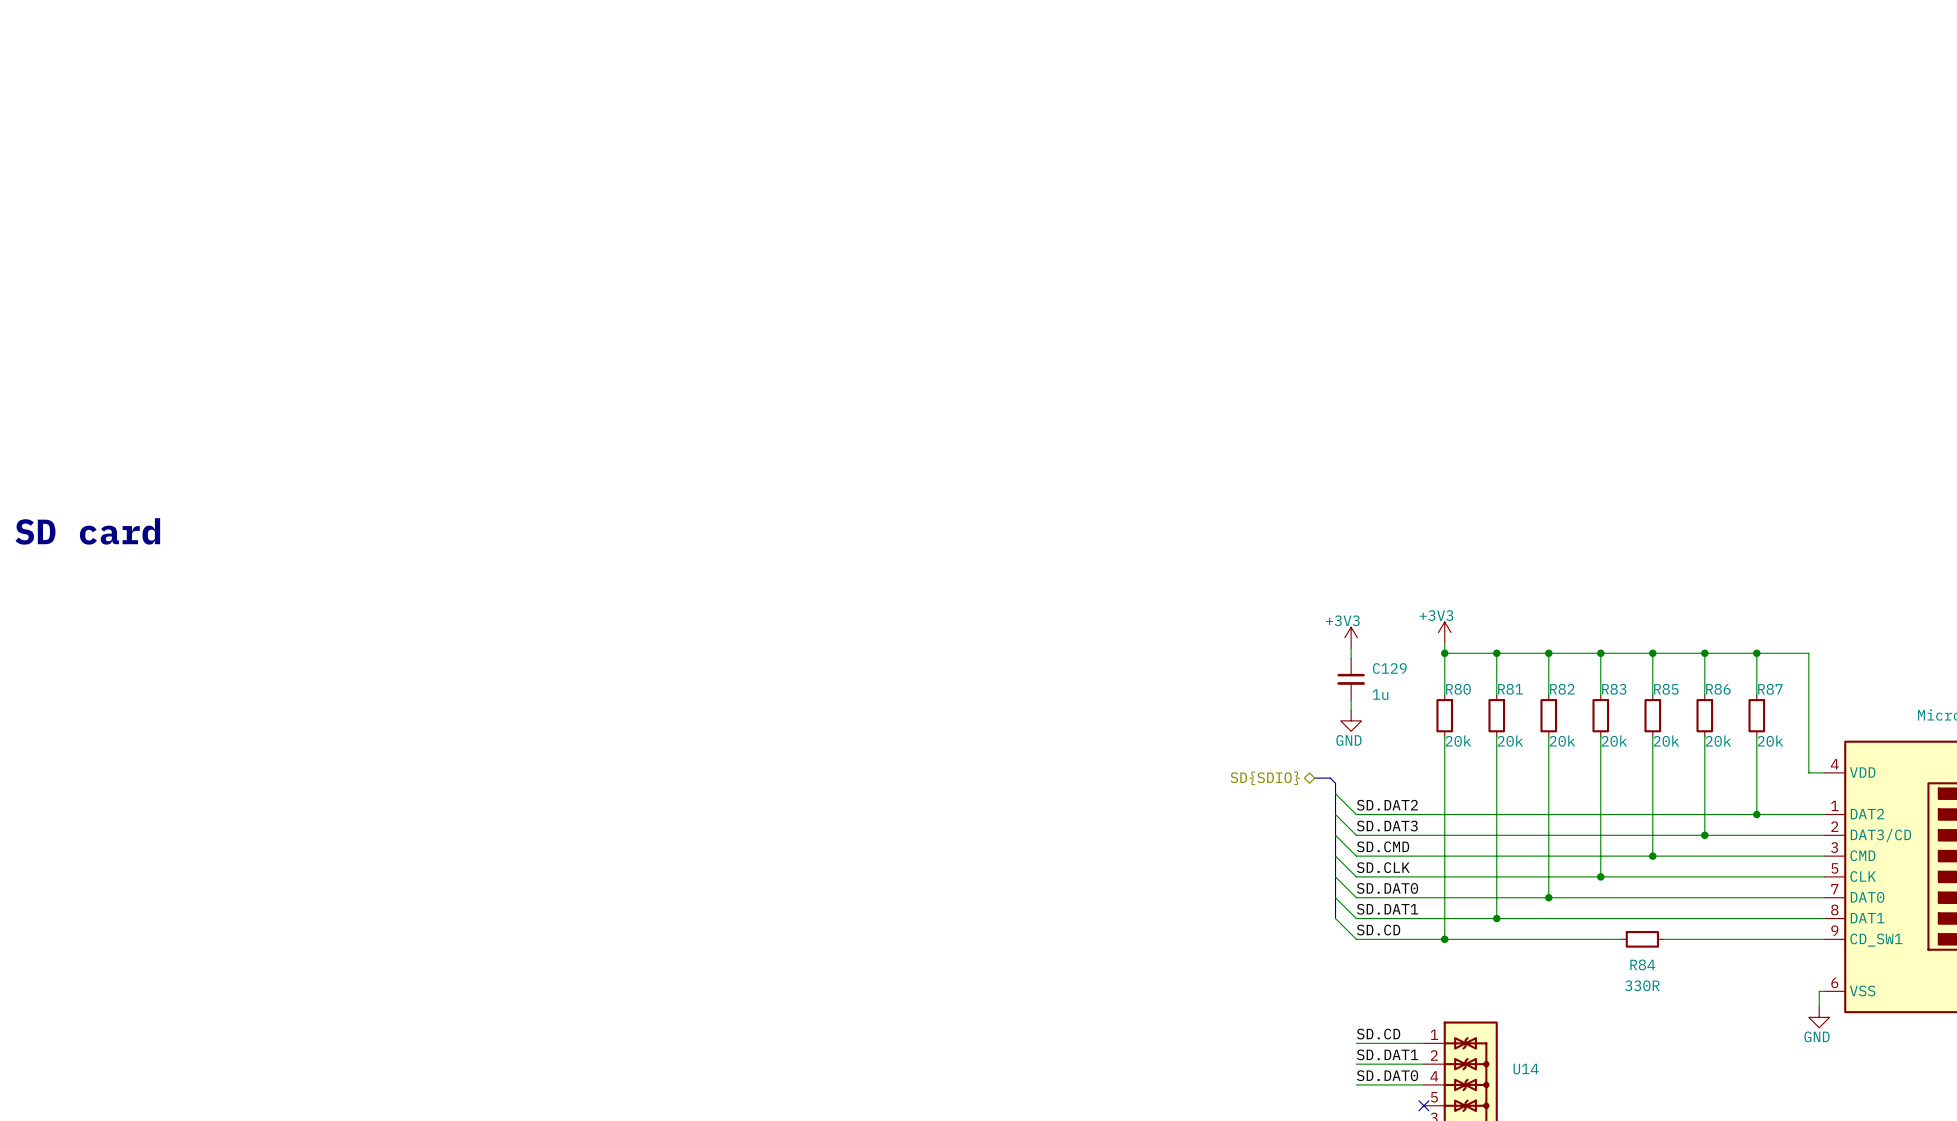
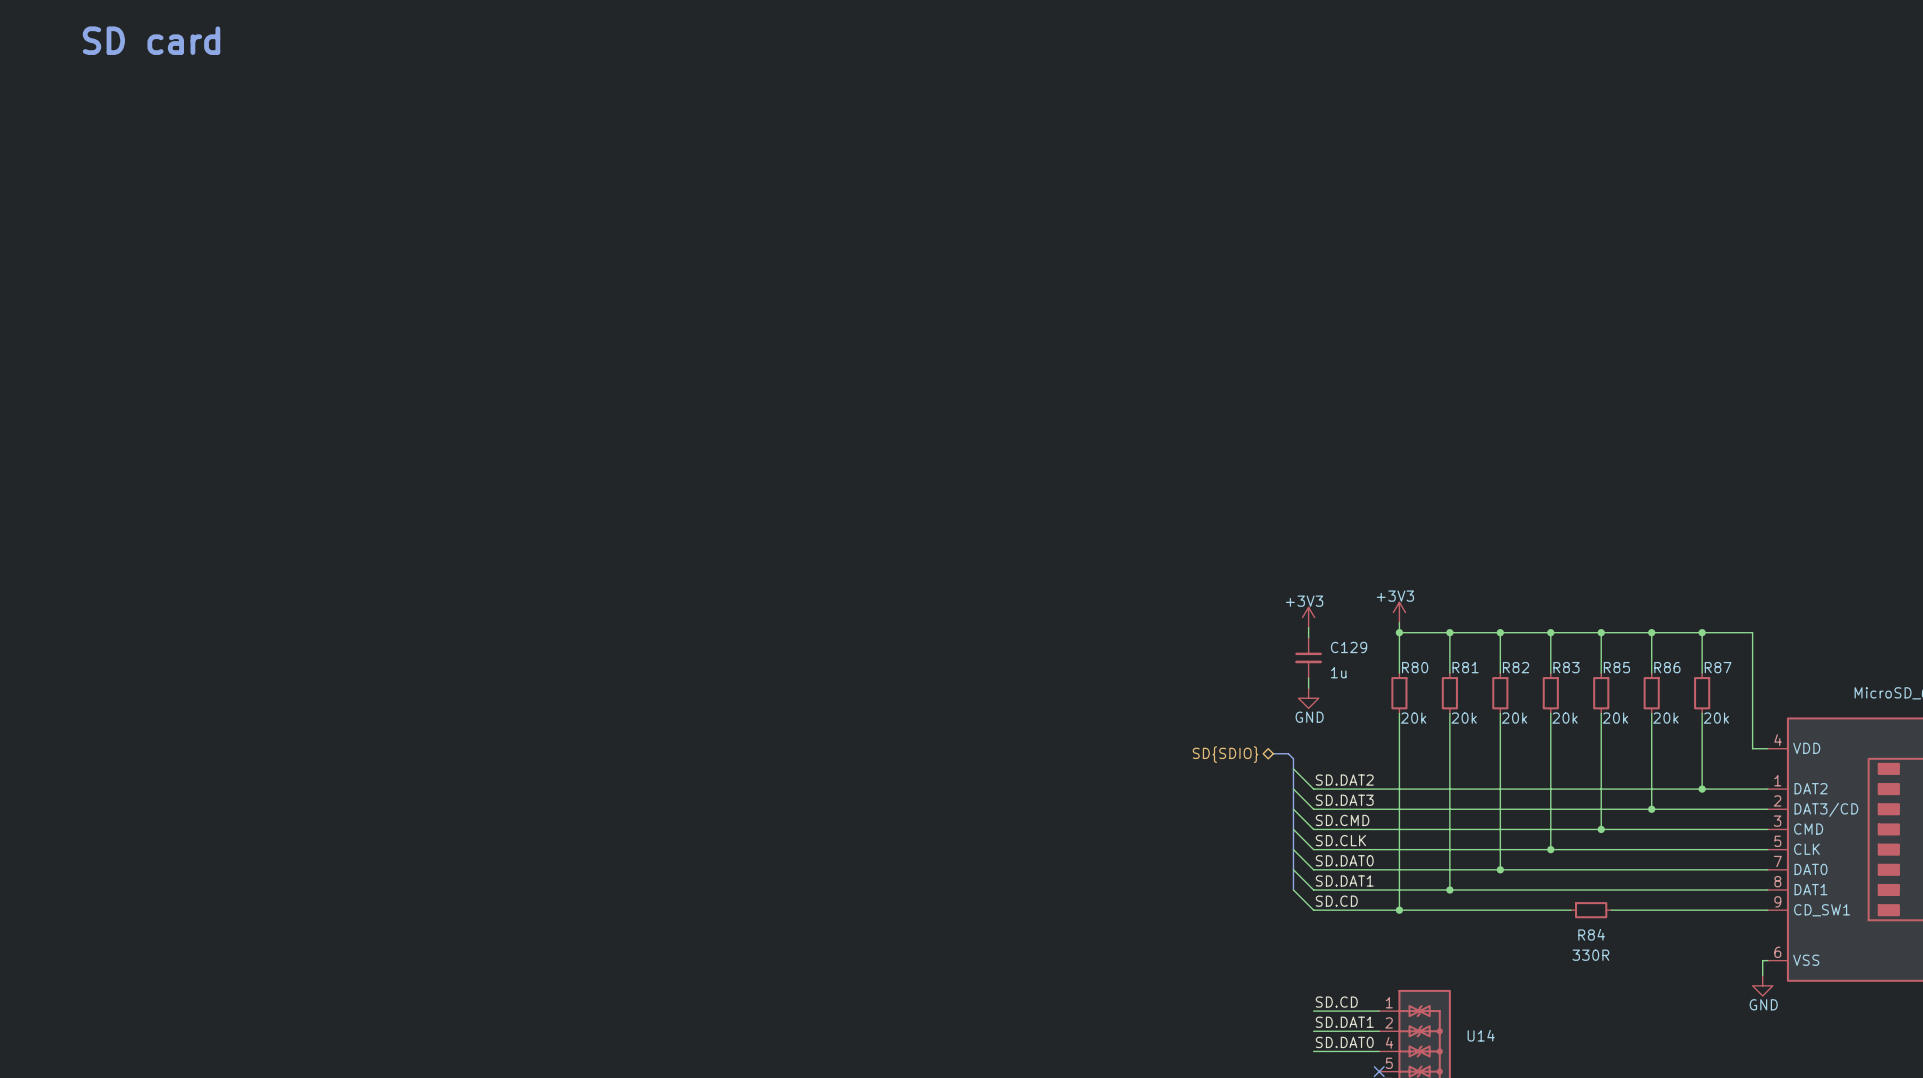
text: none -> SD card (151, 40)
text: SD card (87, 531) -> none

